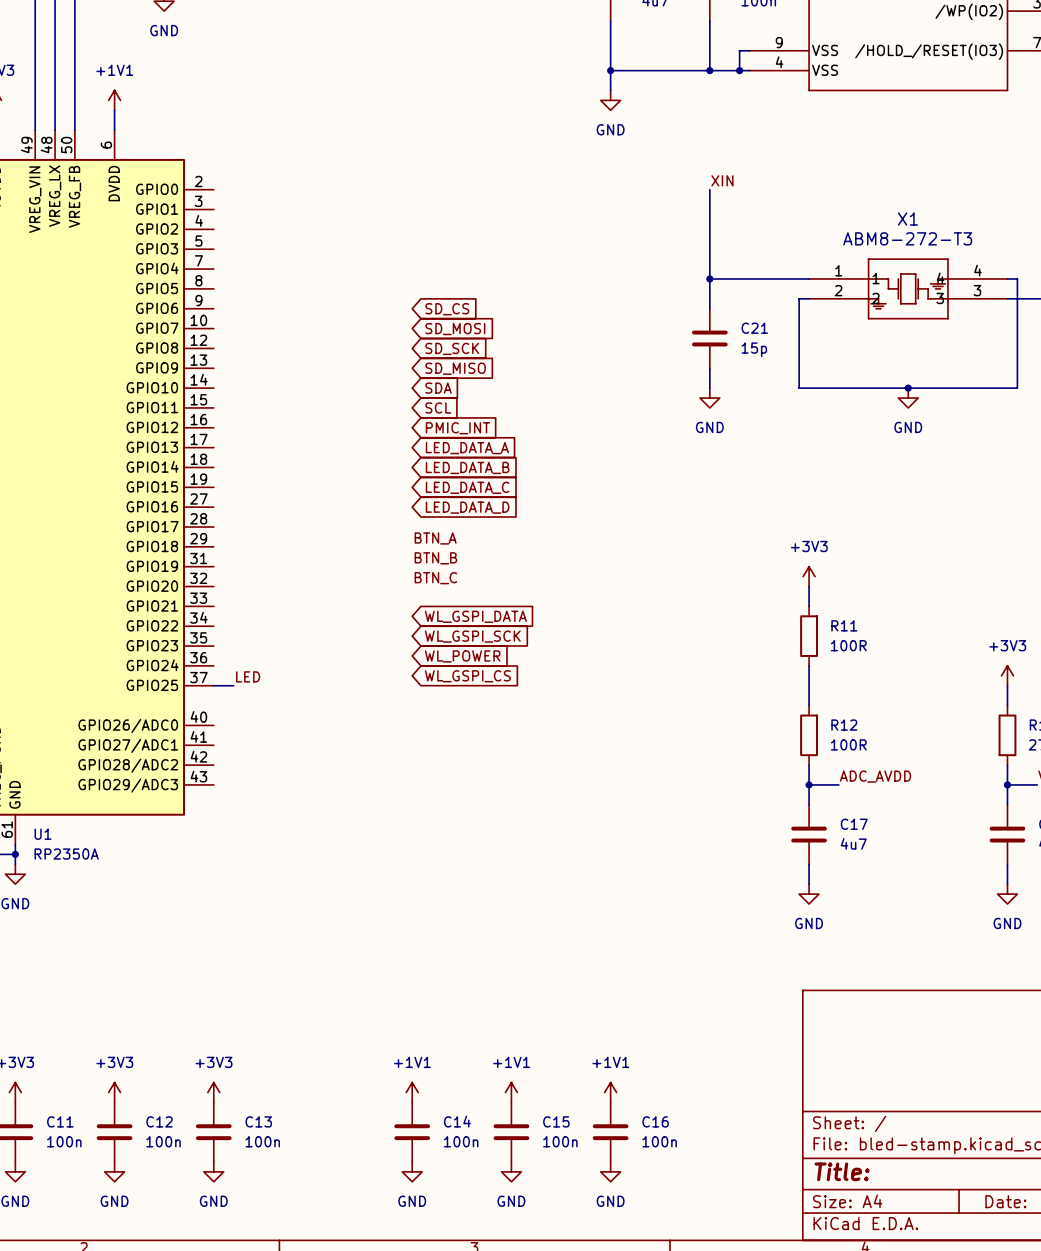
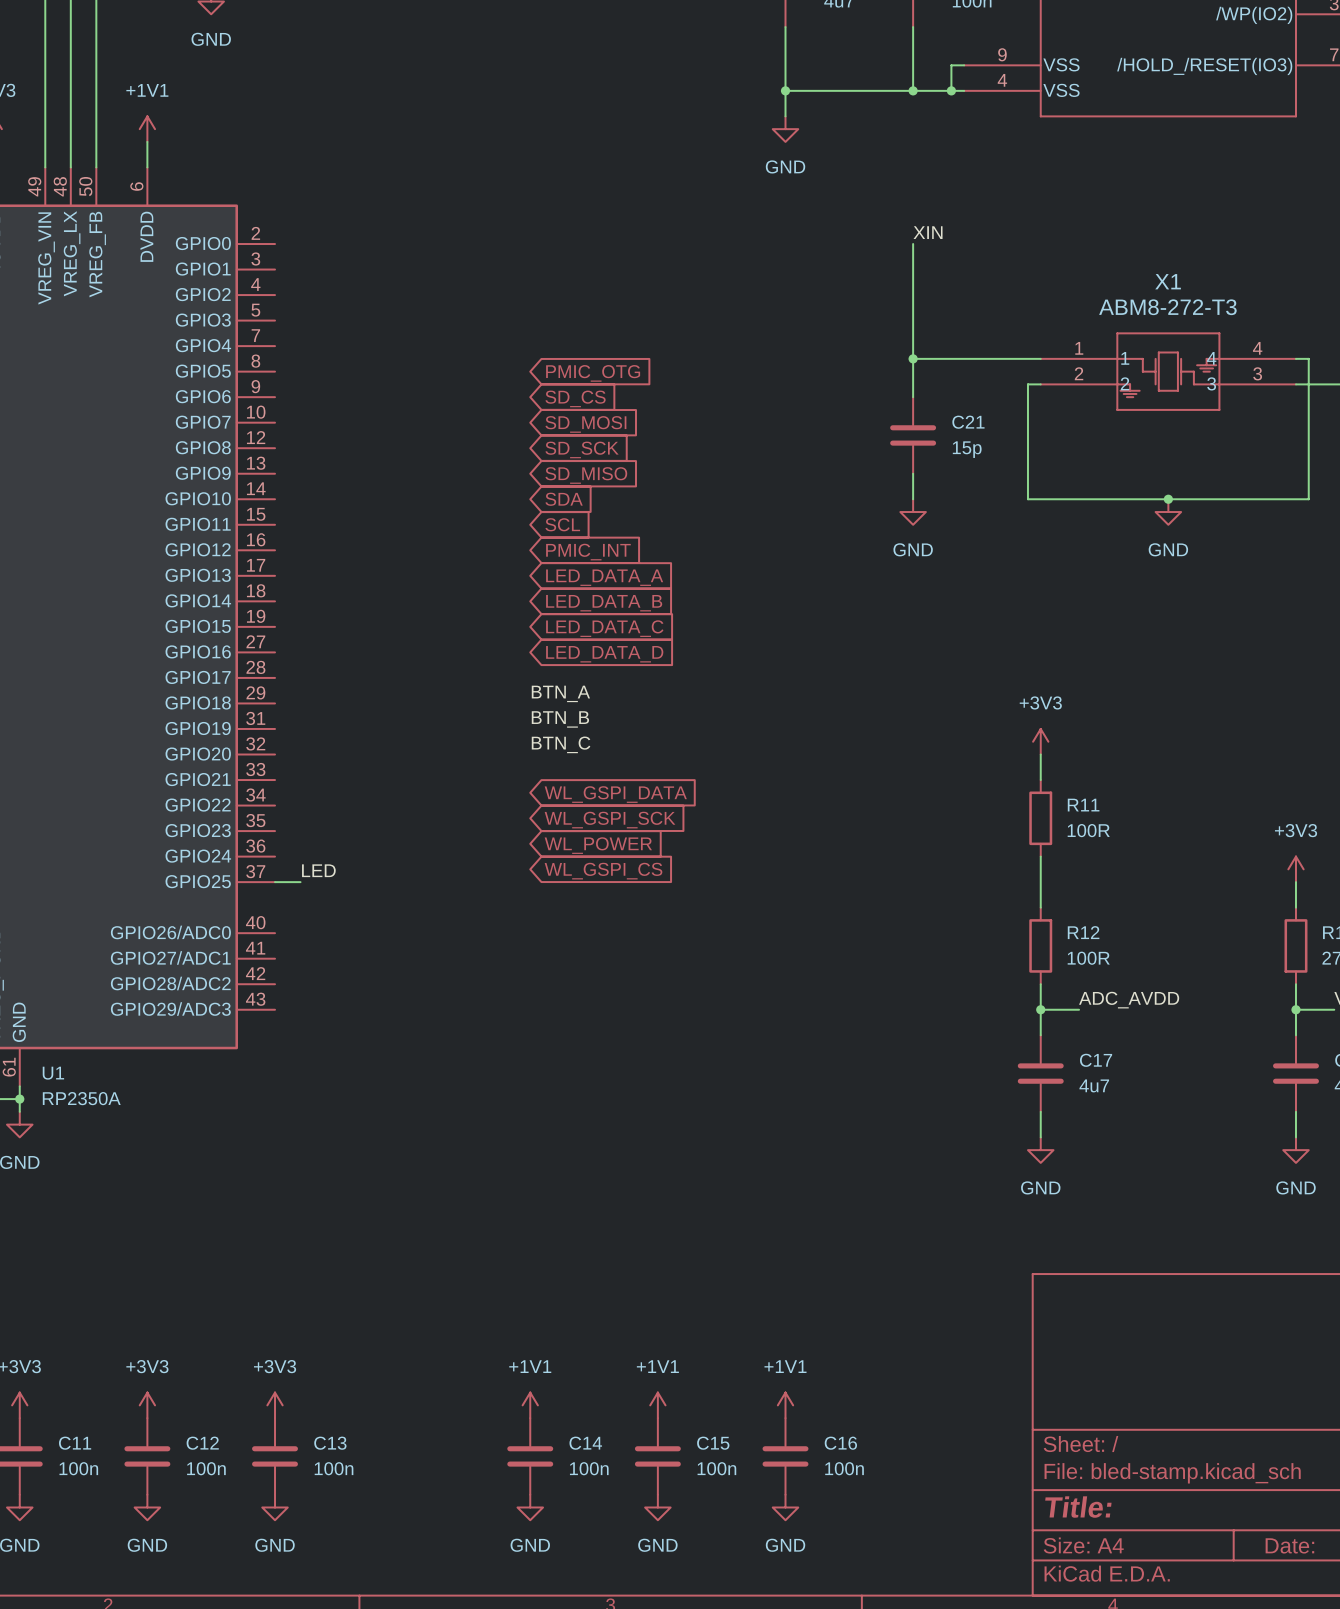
global label: none -> PMIC_OTG (593, 373)

